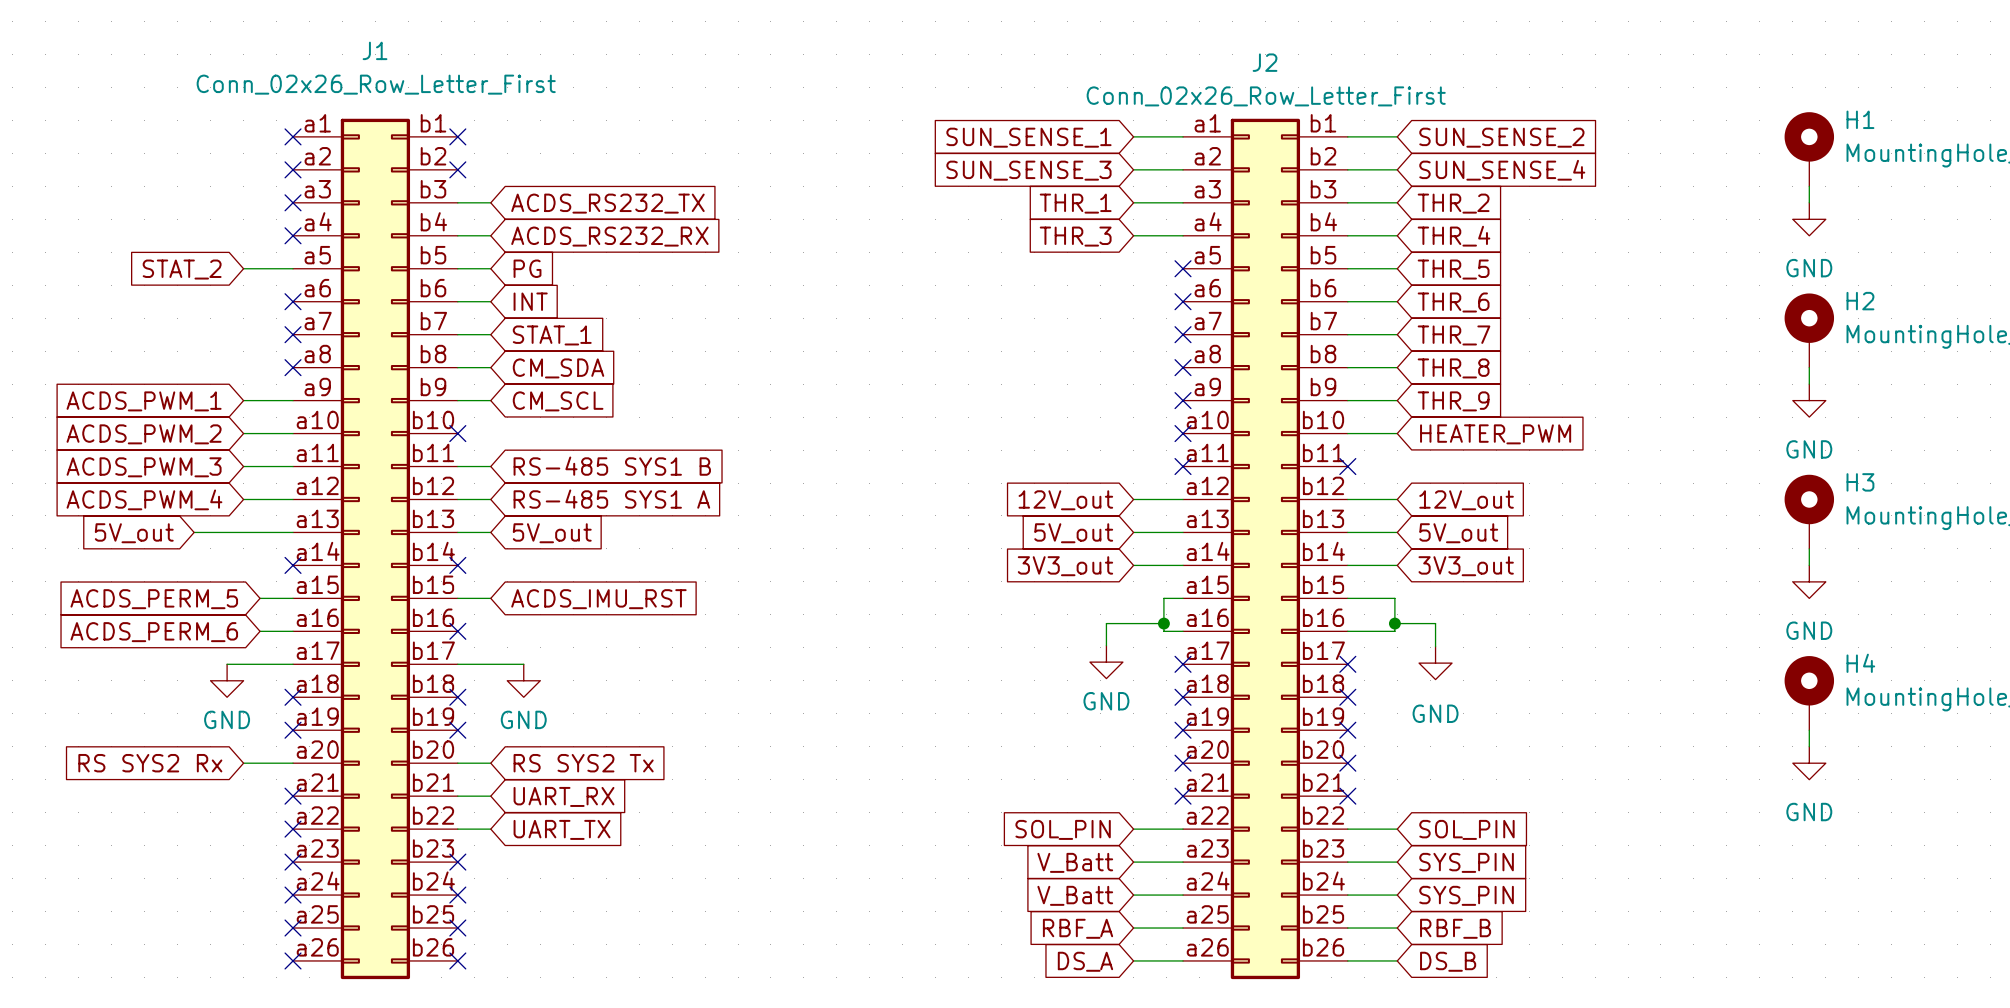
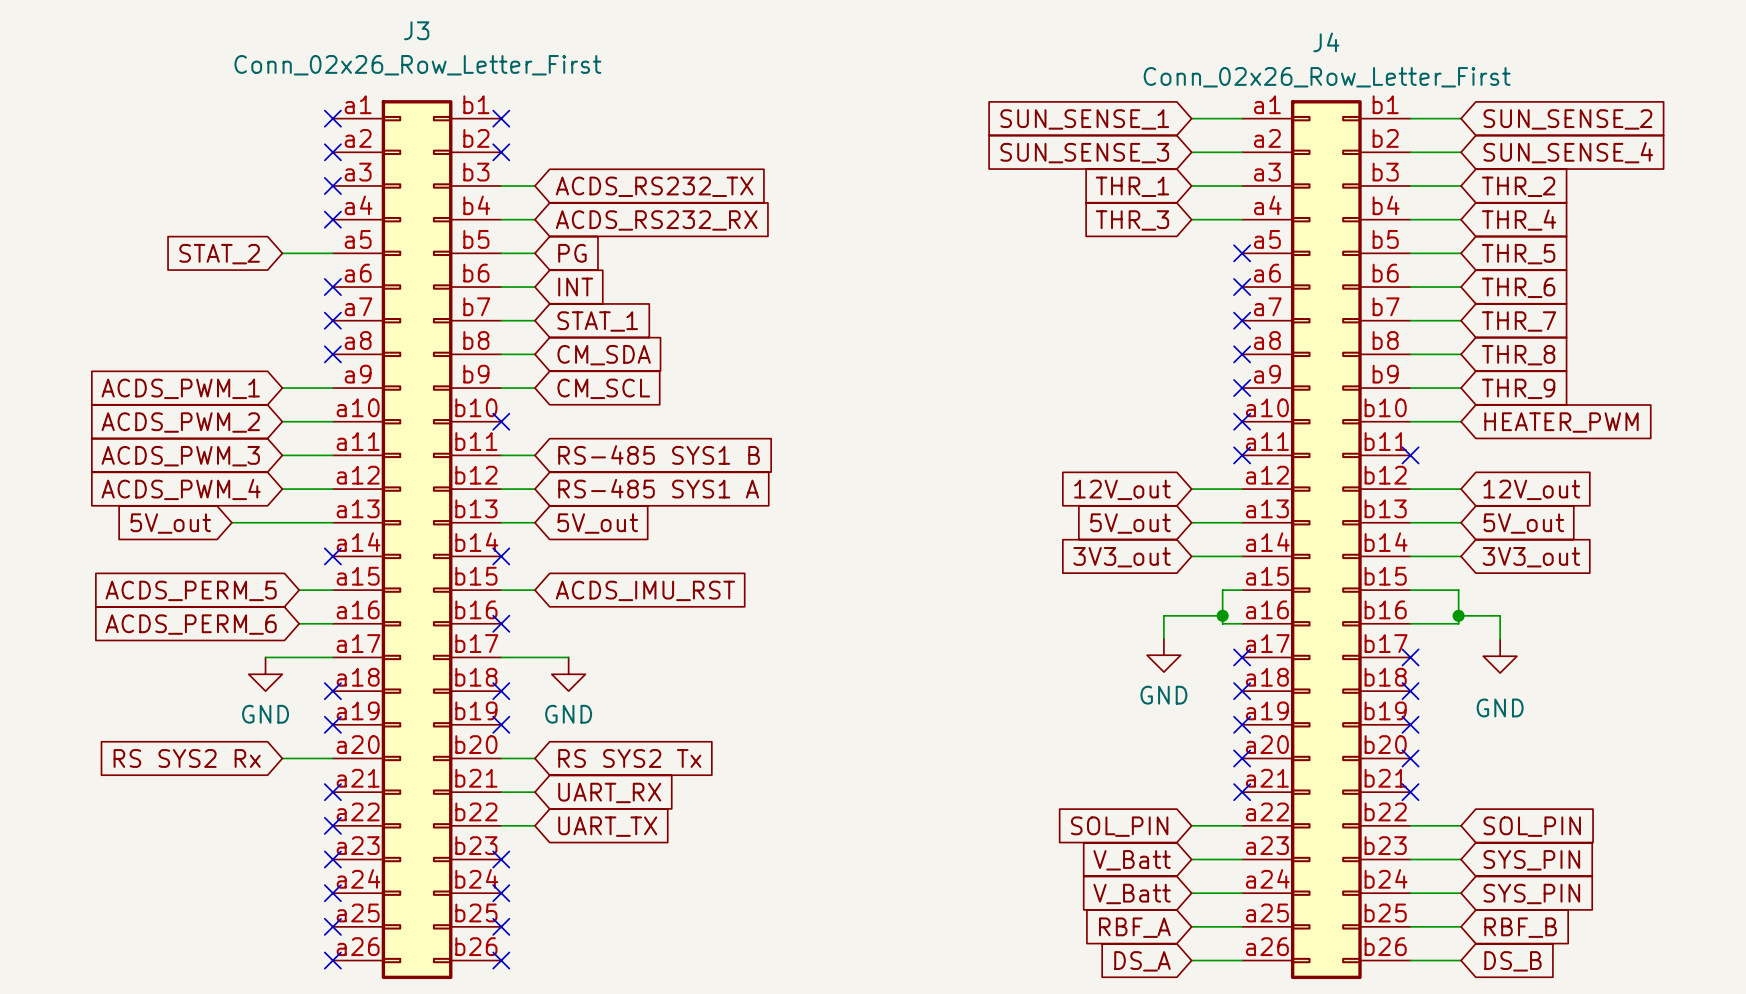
J1 name: J1 (375, 50) -> J3 (416, 30)
J2 name: J2 (1265, 62) -> J4 (1326, 42)

